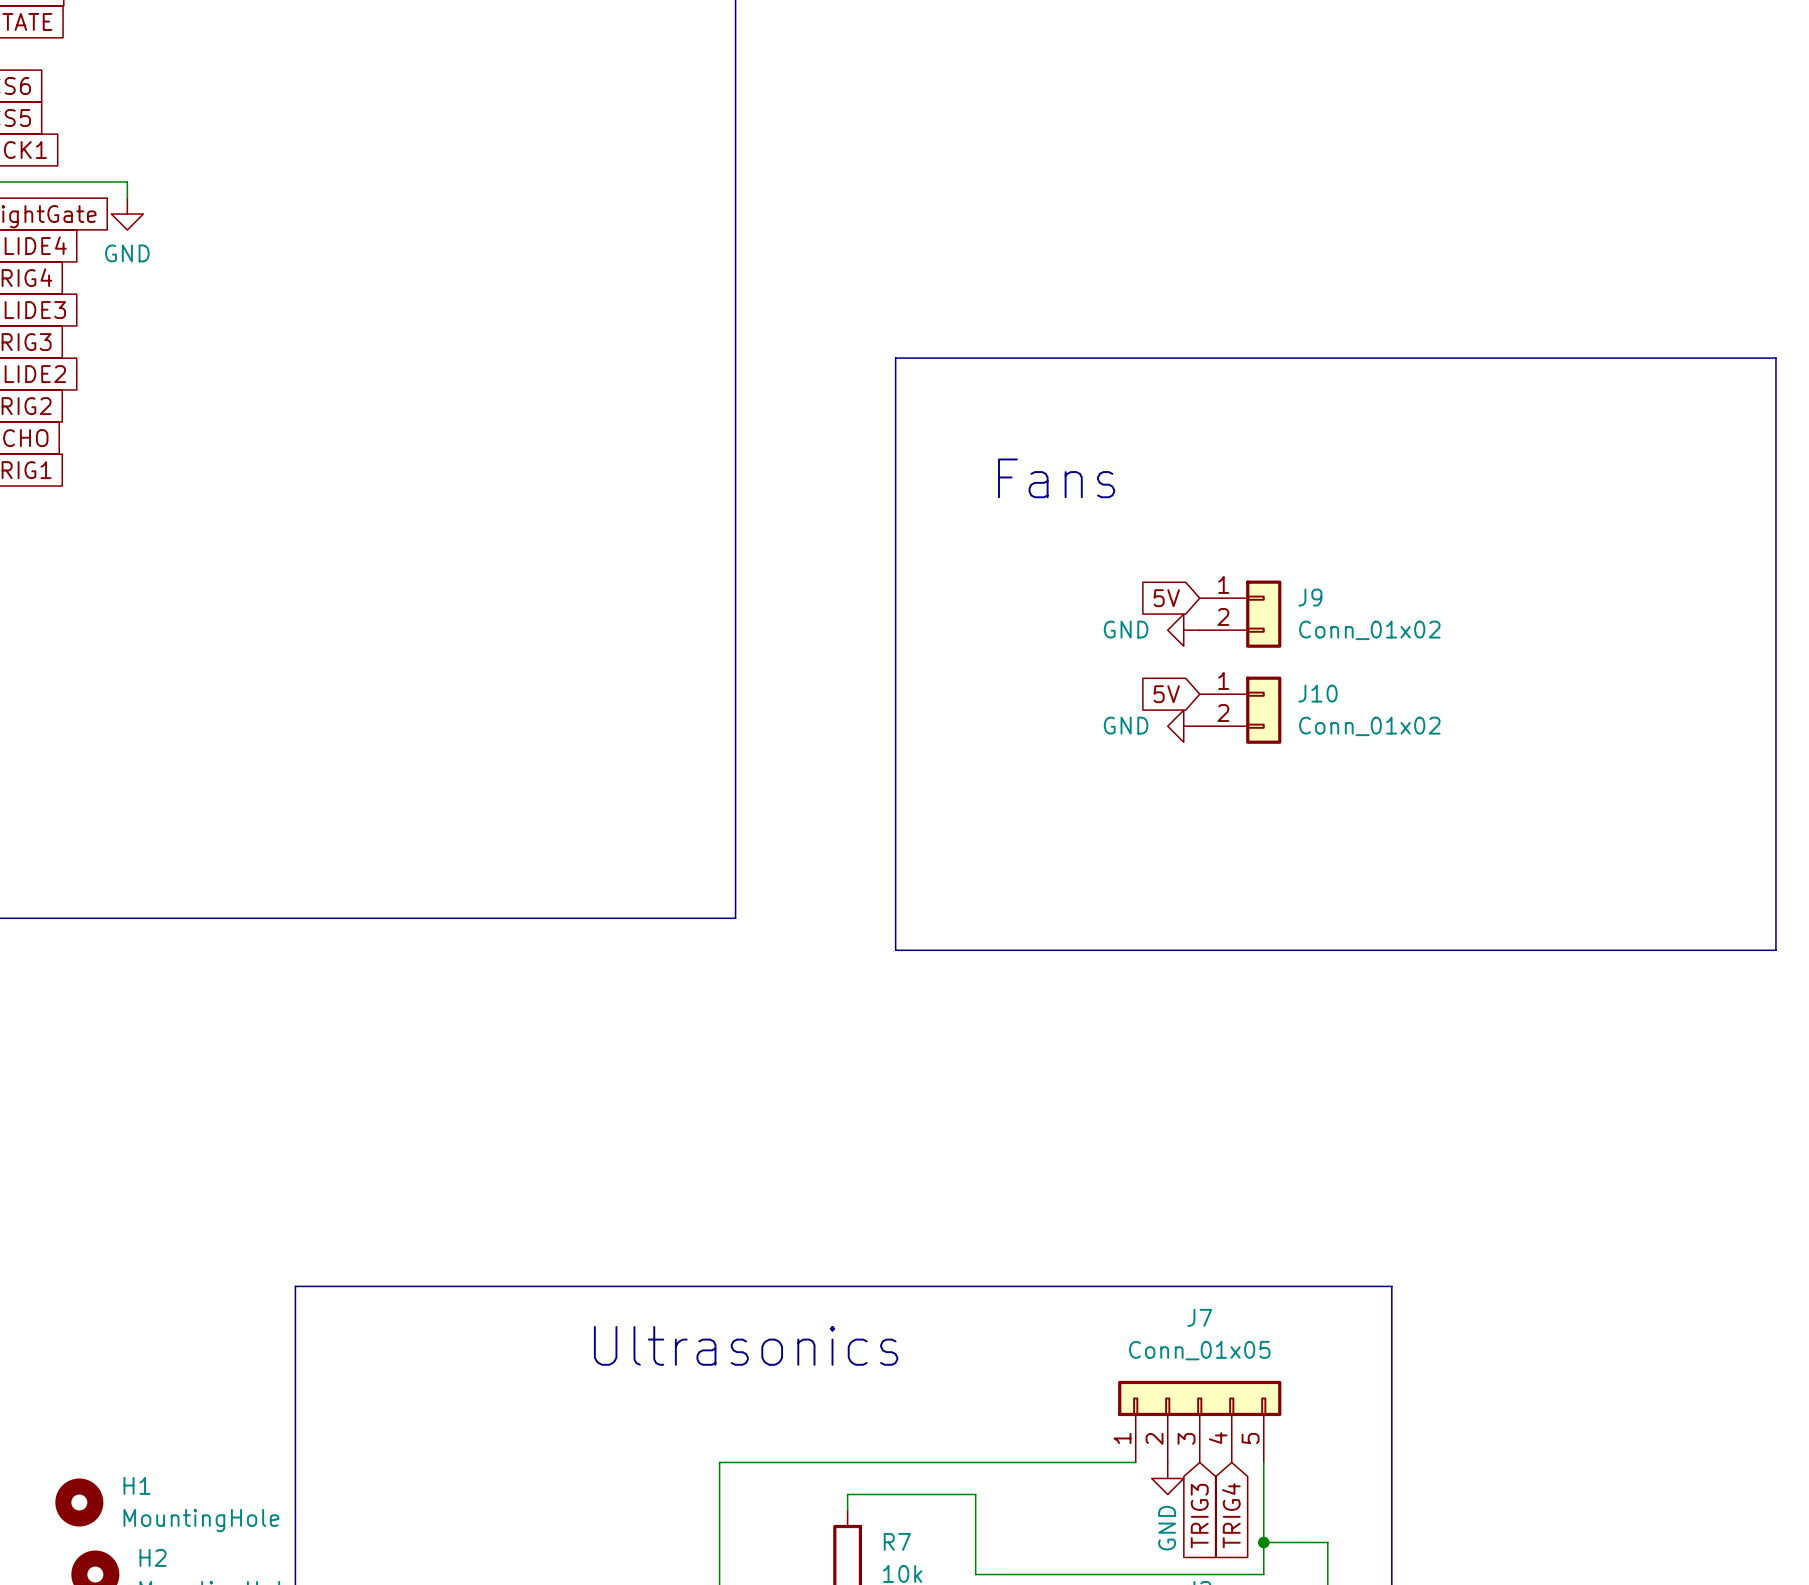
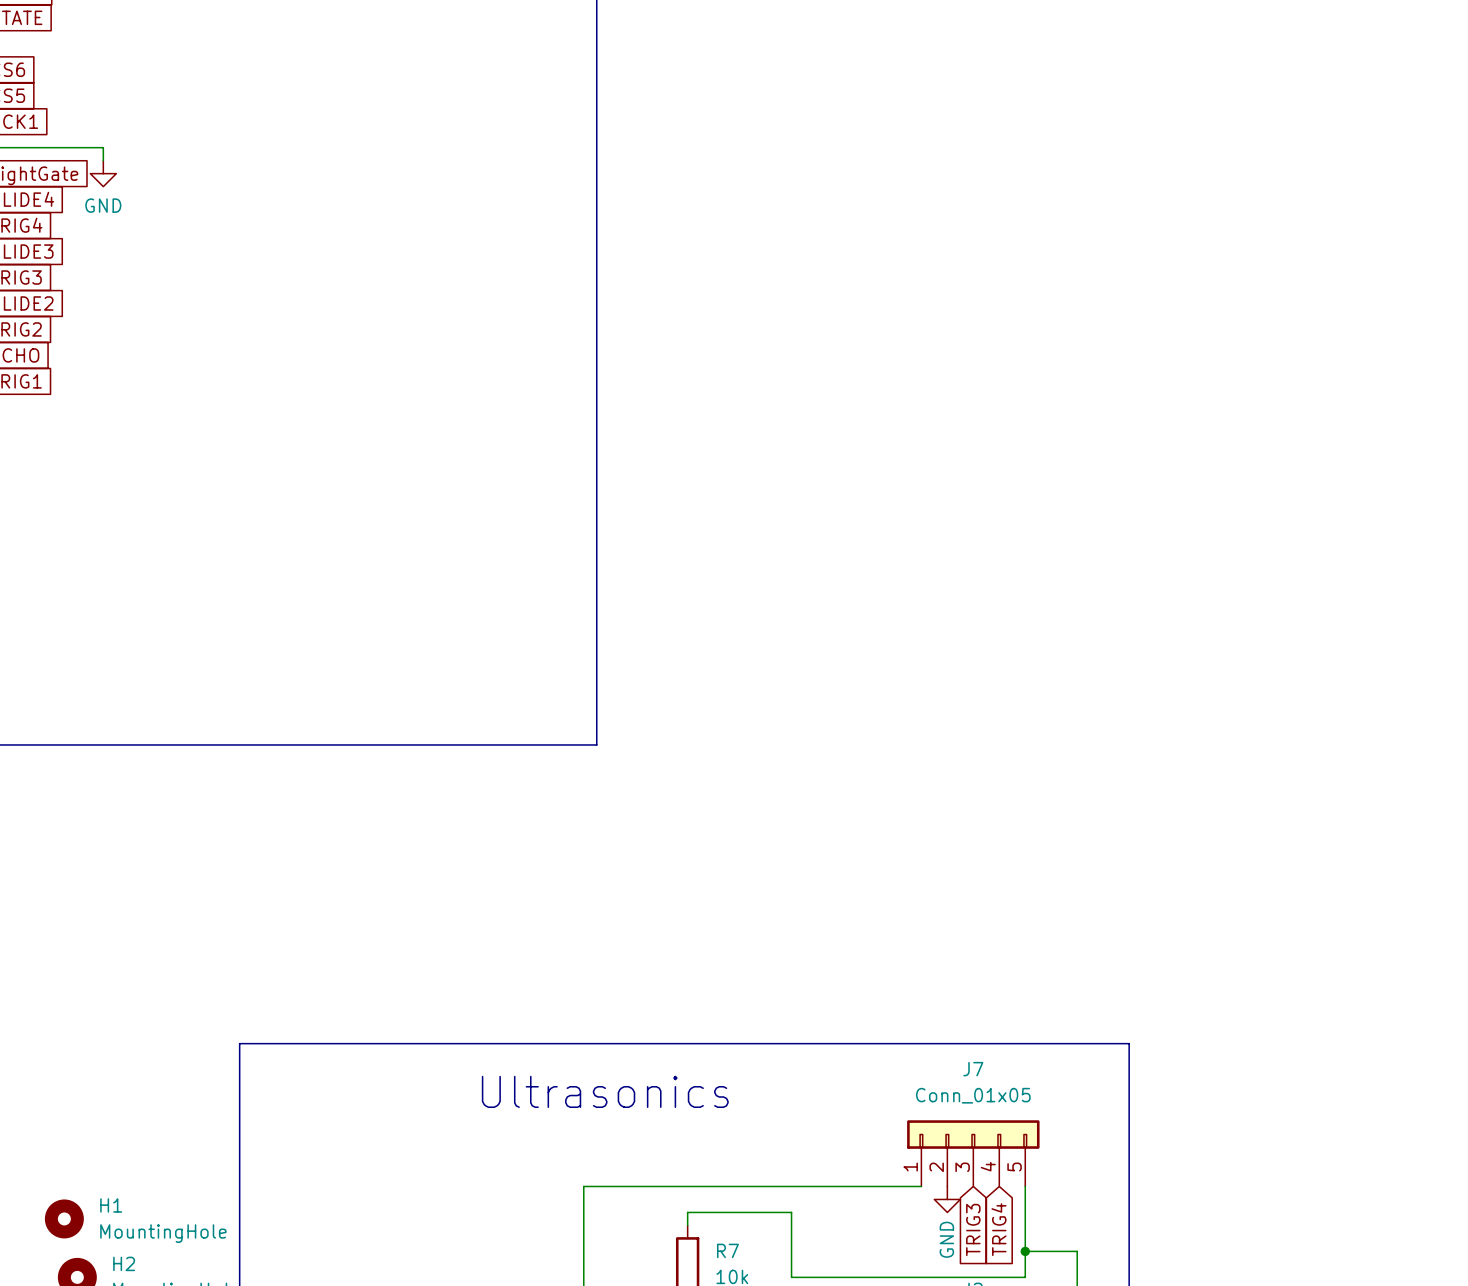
line: (895, 358) (1775, 358) (1775, 950) (895, 950) (895, 358) -> none
text: Fans (1056, 478) -> none
global label: 5V (1166, 598) -> none
J9: Conn_01x02 (1240, 614) -> none
power symbol: GND (1183, 630) -> none
global label: 5V (1166, 694) -> none
J10: Conn_01x02 (1240, 710) -> none
power symbol: GND (1183, 726) -> none

